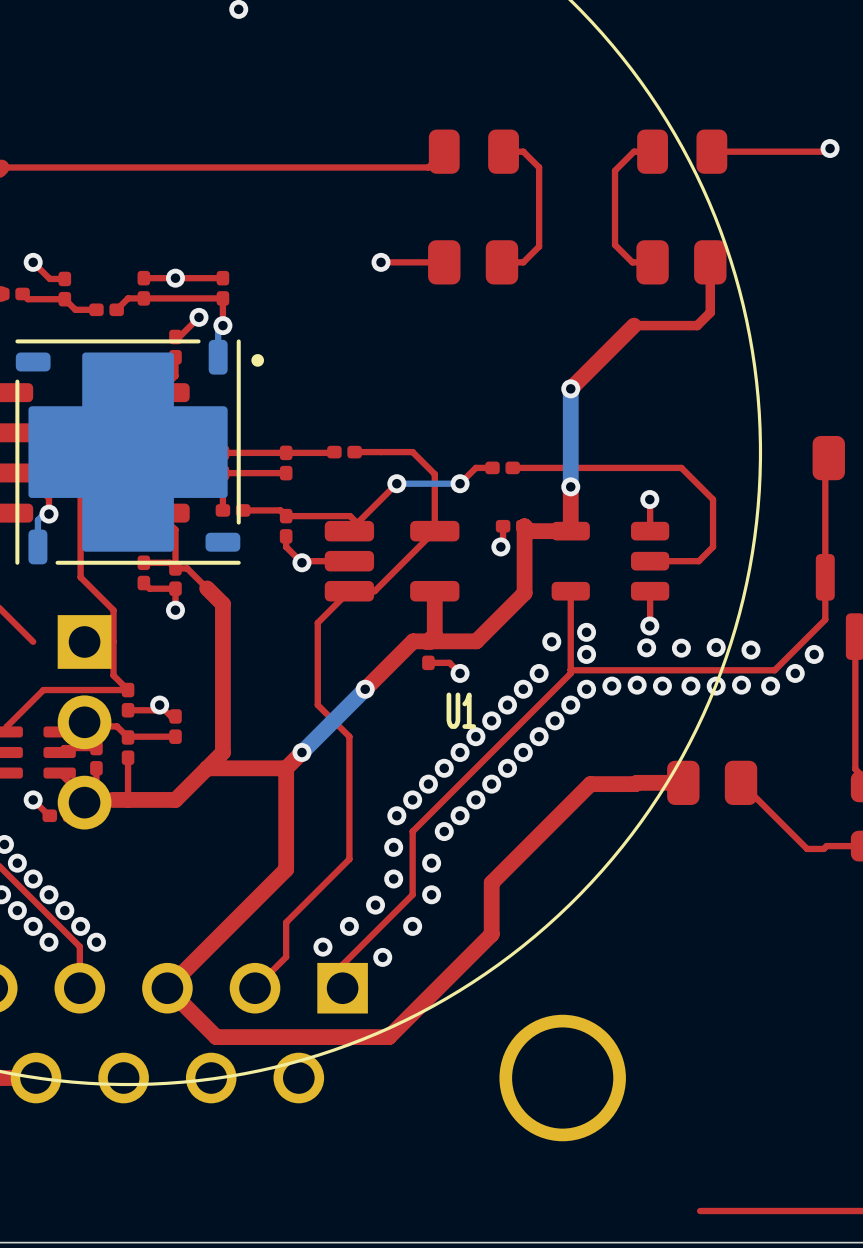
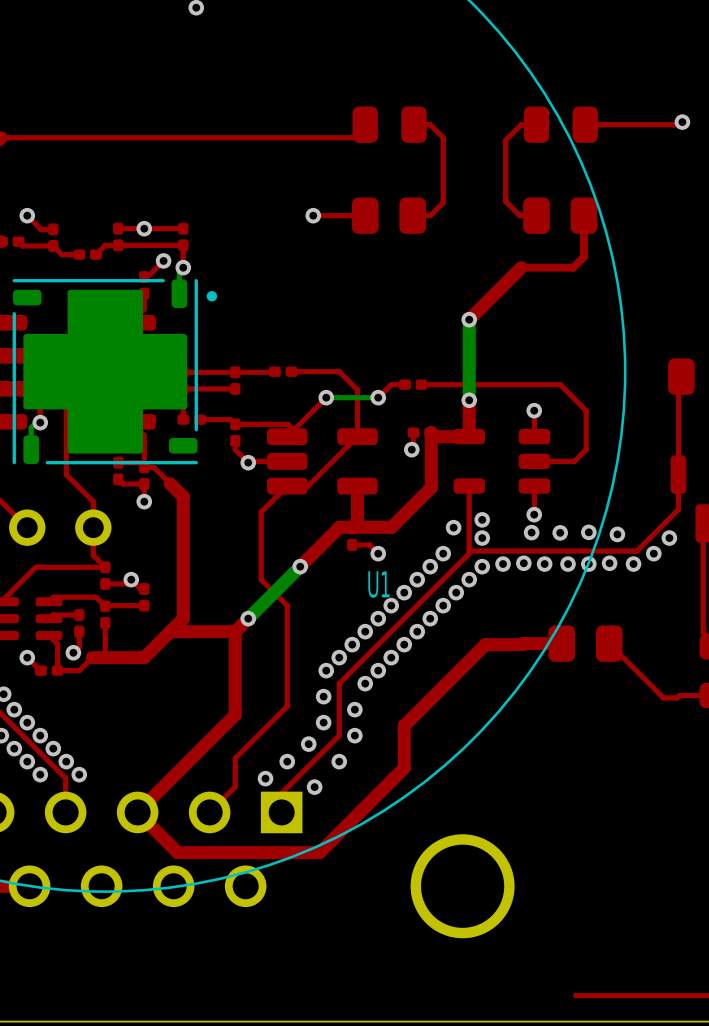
part: none -> (60, 527)
part: (84, 722) -> none

